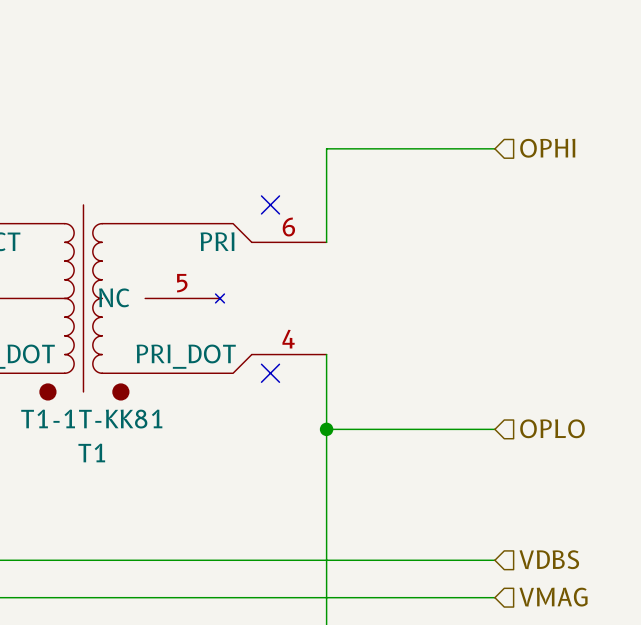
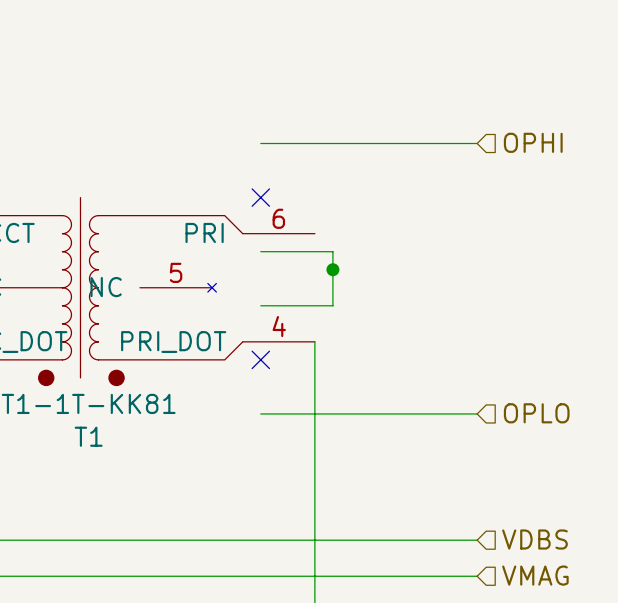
wire: (326, 148) (326, 242) -> (314, 143) (260, 143)
wire: none -> (260, 251) (332, 251) (332, 305) (260, 305)
junction: none -> (332, 269)
wire: none -> (260, 413) (314, 413)
junction: (326, 429) -> none

